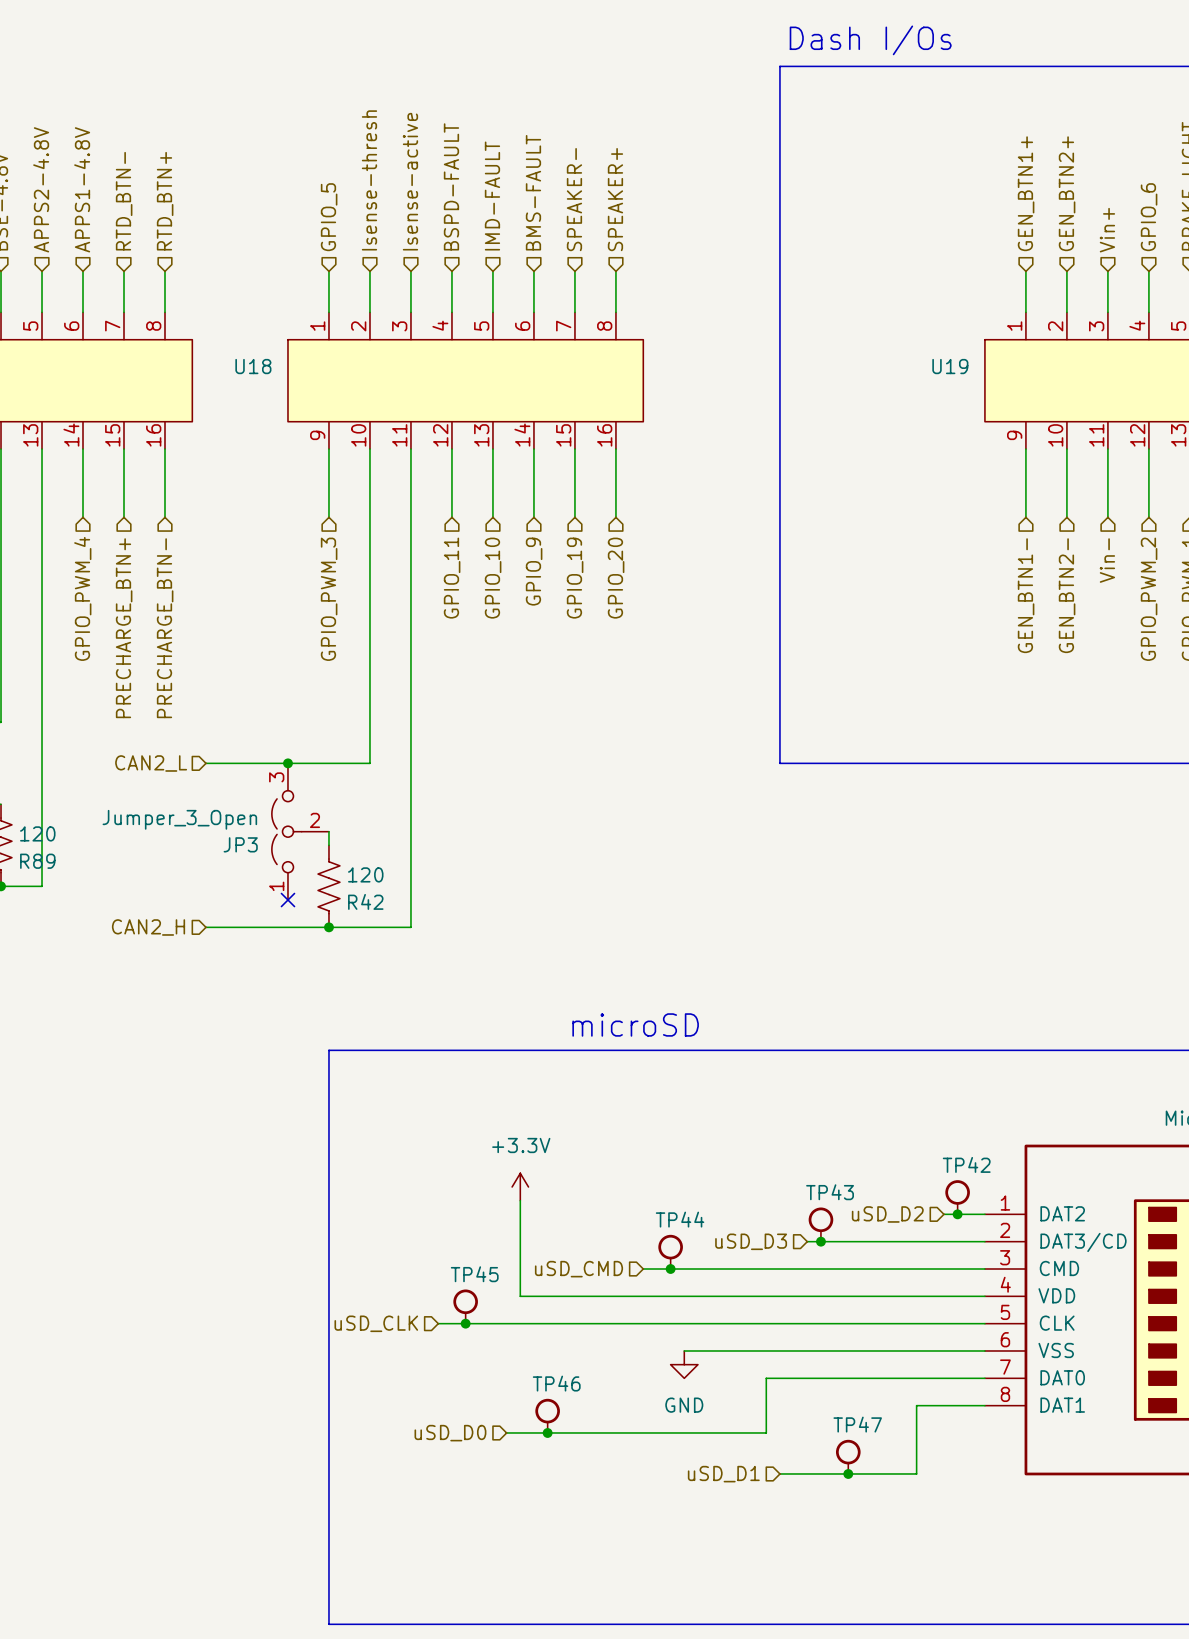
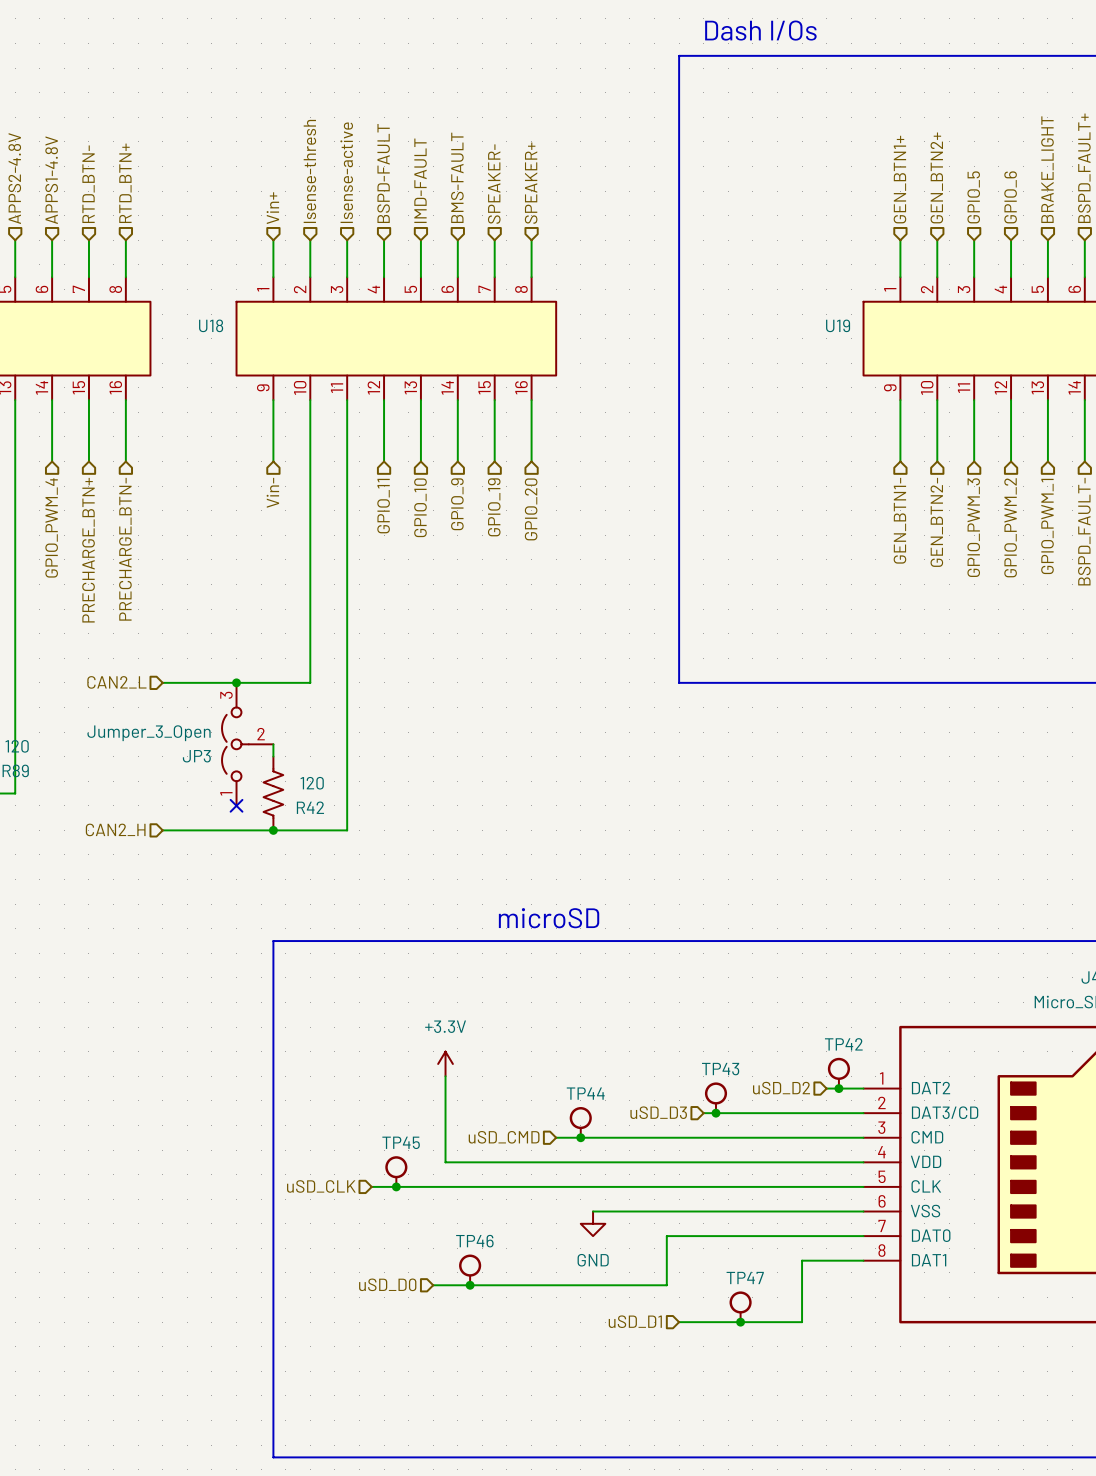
hierarchical label: GPIO_5 (329, 217) -> Vin+ (272, 208)
hierarchical label: Vin+ (1107, 230) -> GPIO_5 (973, 197)
hierarchical label: Vin- (1107, 560) -> GPIO_PWM_3 (973, 527)
hierarchical label: GPIO_PWM_3 (329, 599) -> Vin- (272, 492)

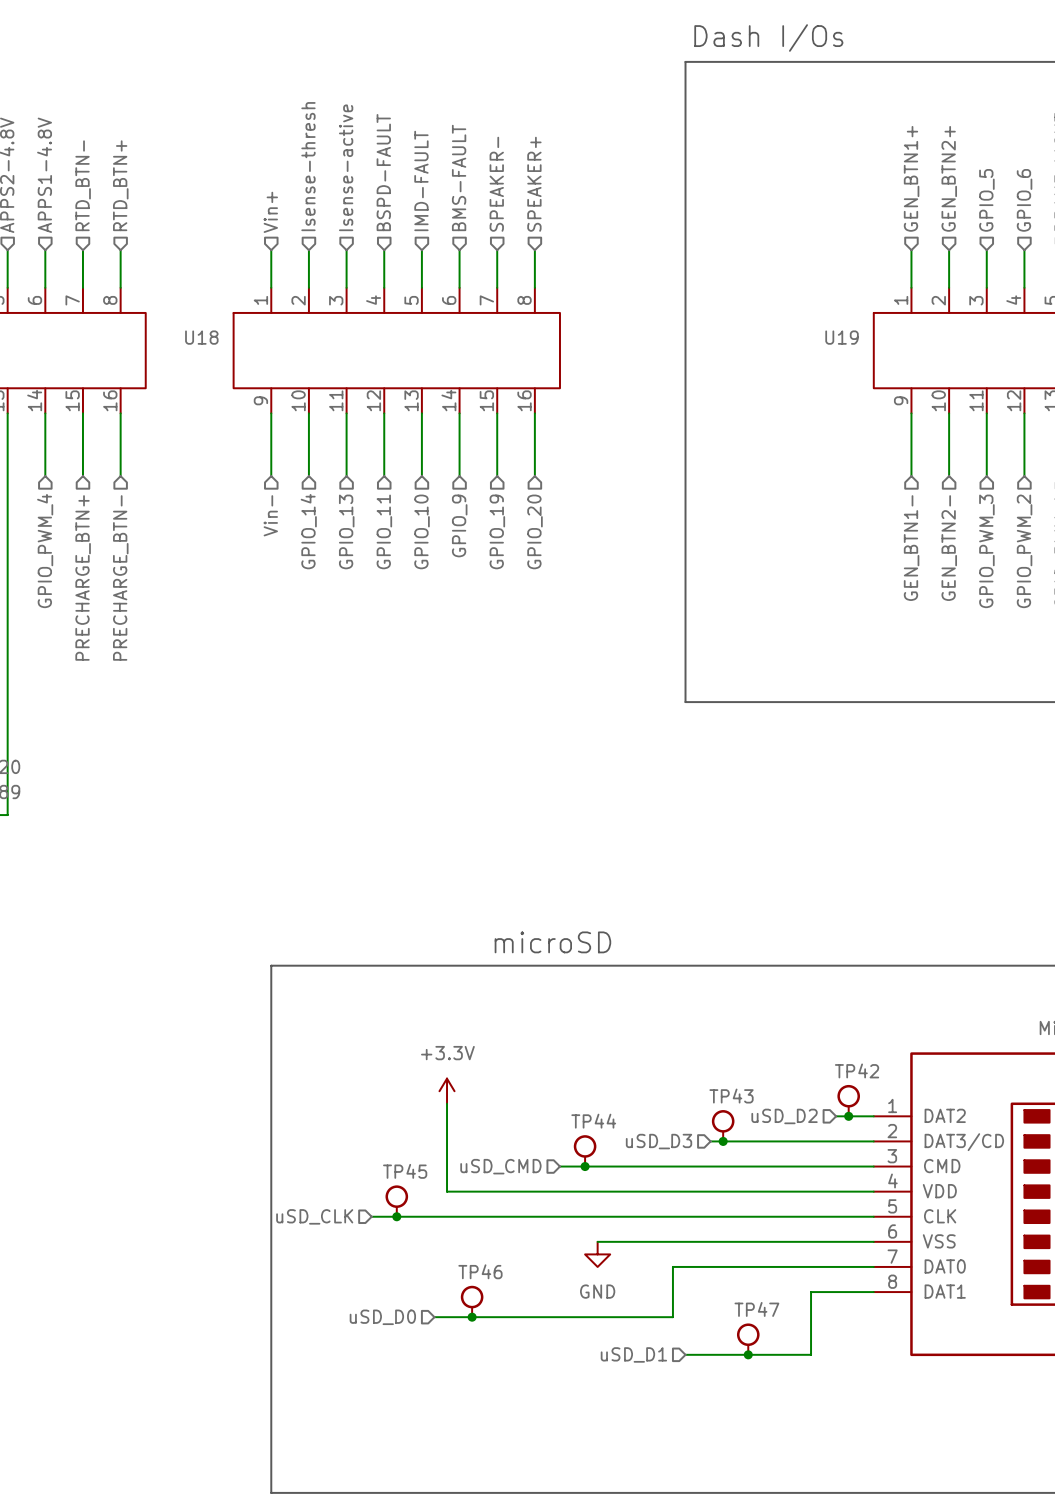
wire: (310, 461) (310, 682) (162, 682) -> none
wire: (347, 461) (347, 830) (162, 830) -> none
hierarchical label: none -> GPIO_14 (308, 531)
hierarchical label: none -> GPIO_13 (346, 531)
hierarchical label: CAN2_L (116, 682) -> none
junction: (236, 682) -> none
JP3: Jumper_3_Open (247, 744) -> none
wire: (273, 744) (273, 756) -> none
R42: 120 (273, 793) -> none
no-connect mark: (236, 805) -> none
hierarchical label: CAN2_H (115, 829) -> none
junction: (273, 830) -> none

